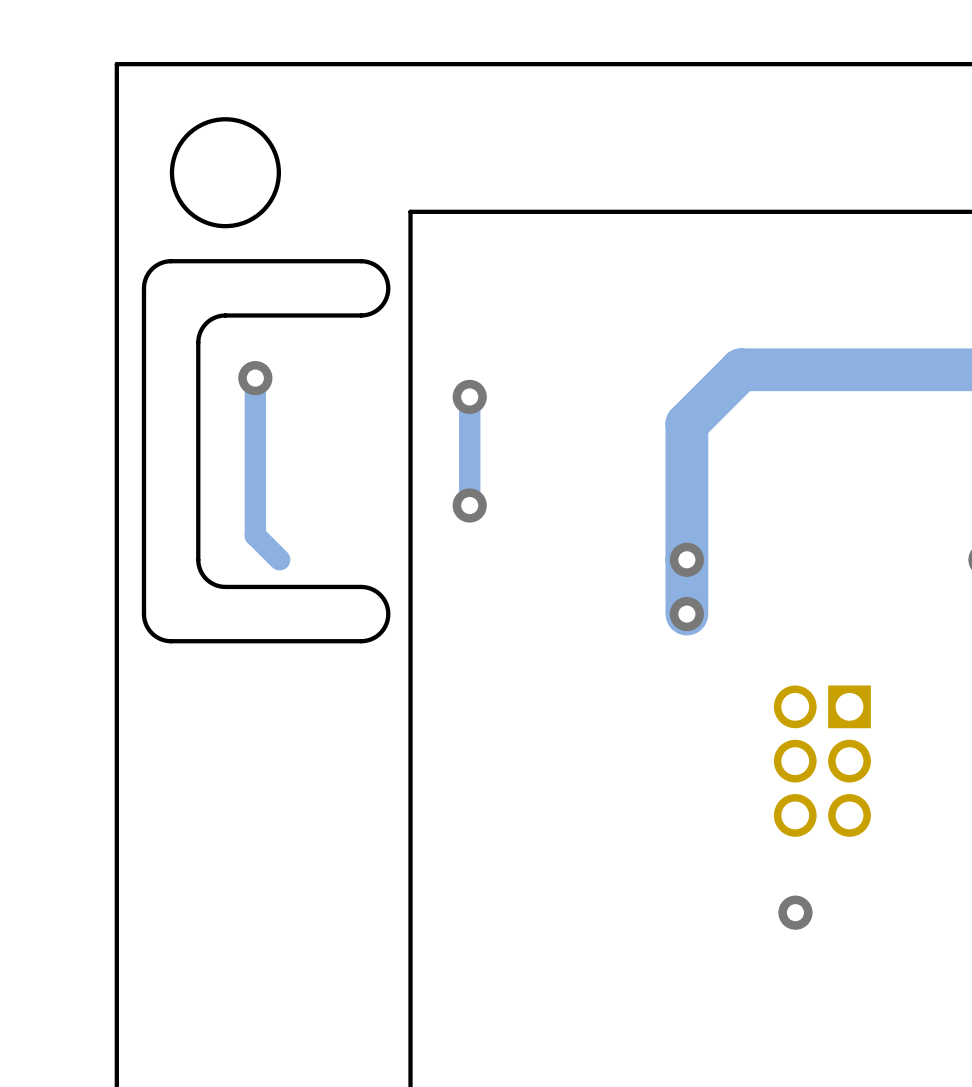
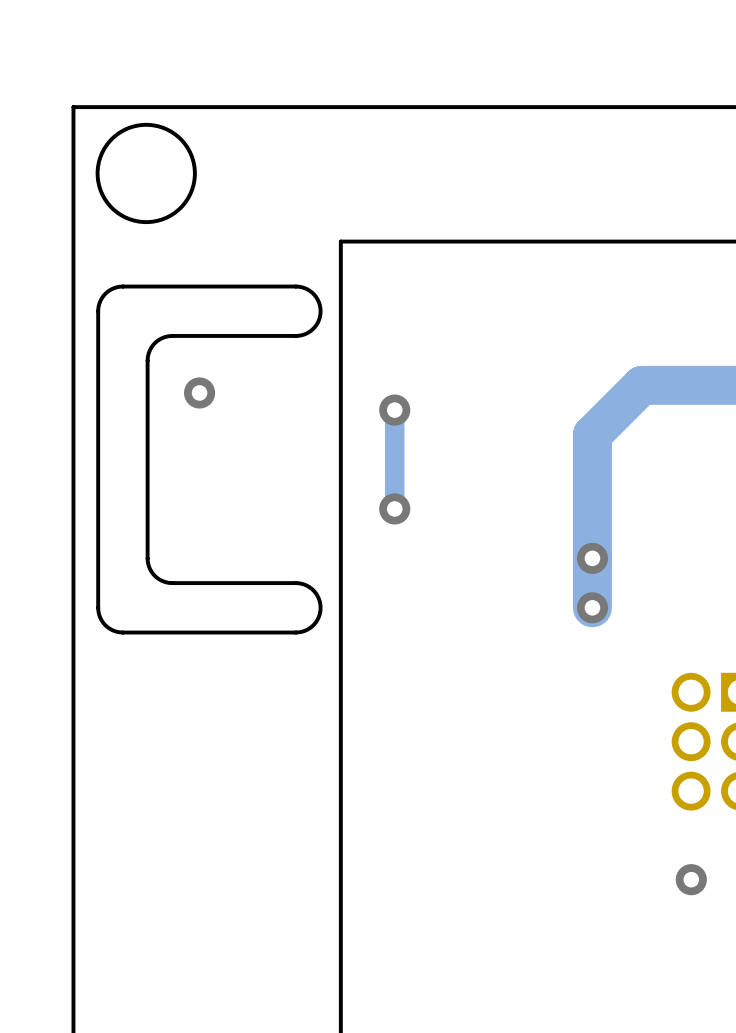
round board edge position: (225, 172) -> (146, 173)
track: (255, 378) (255, 535) (279, 559) -> none

